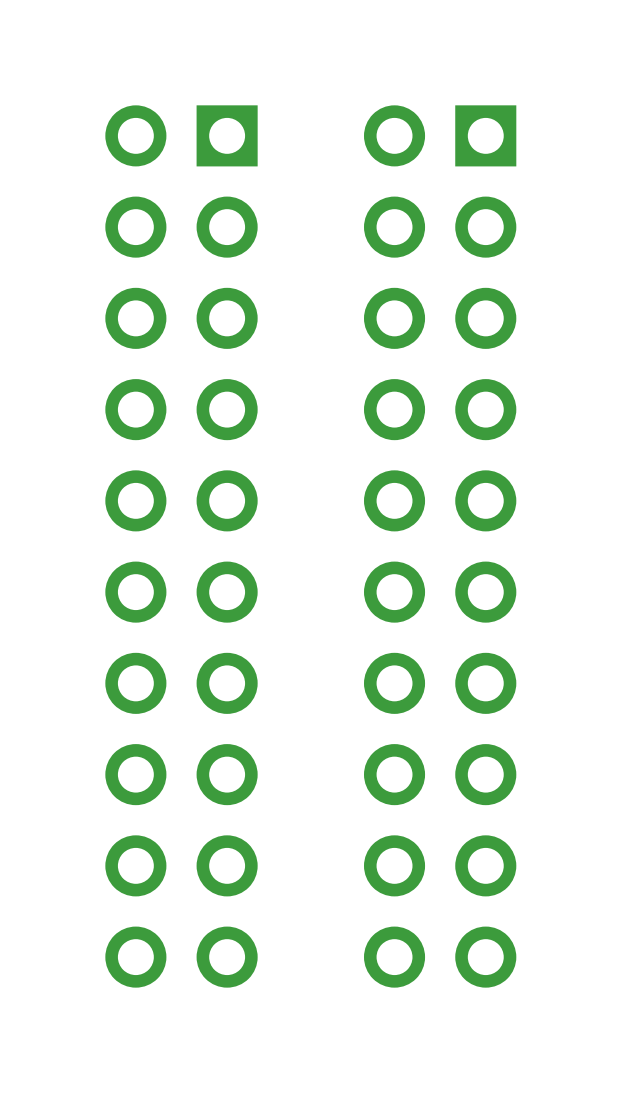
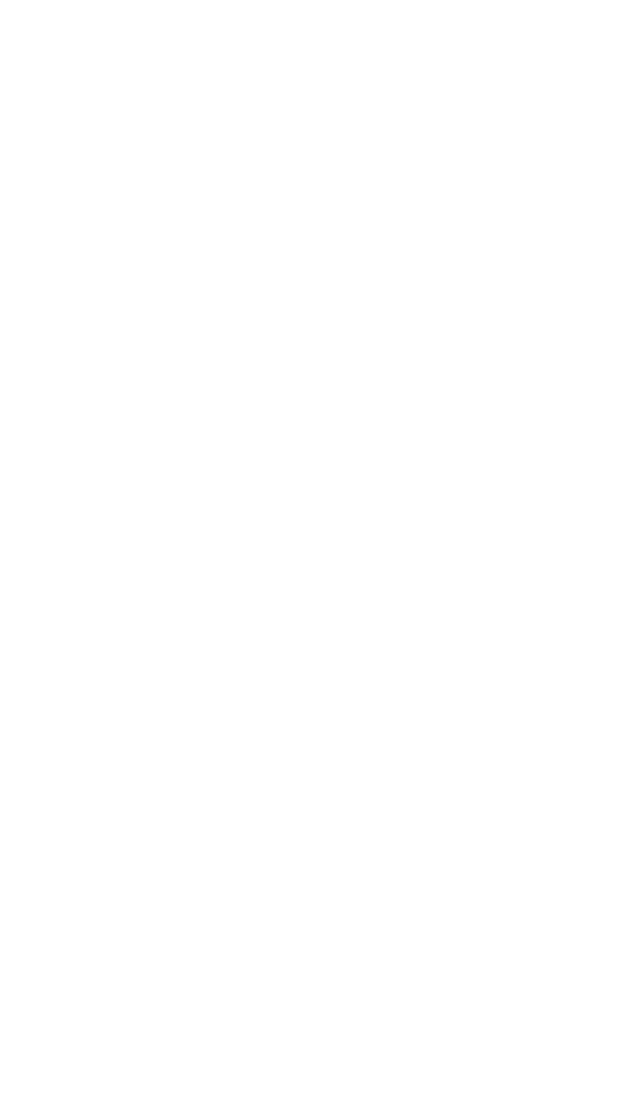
part: (181, 546) -> none
part: (440, 546) -> none

